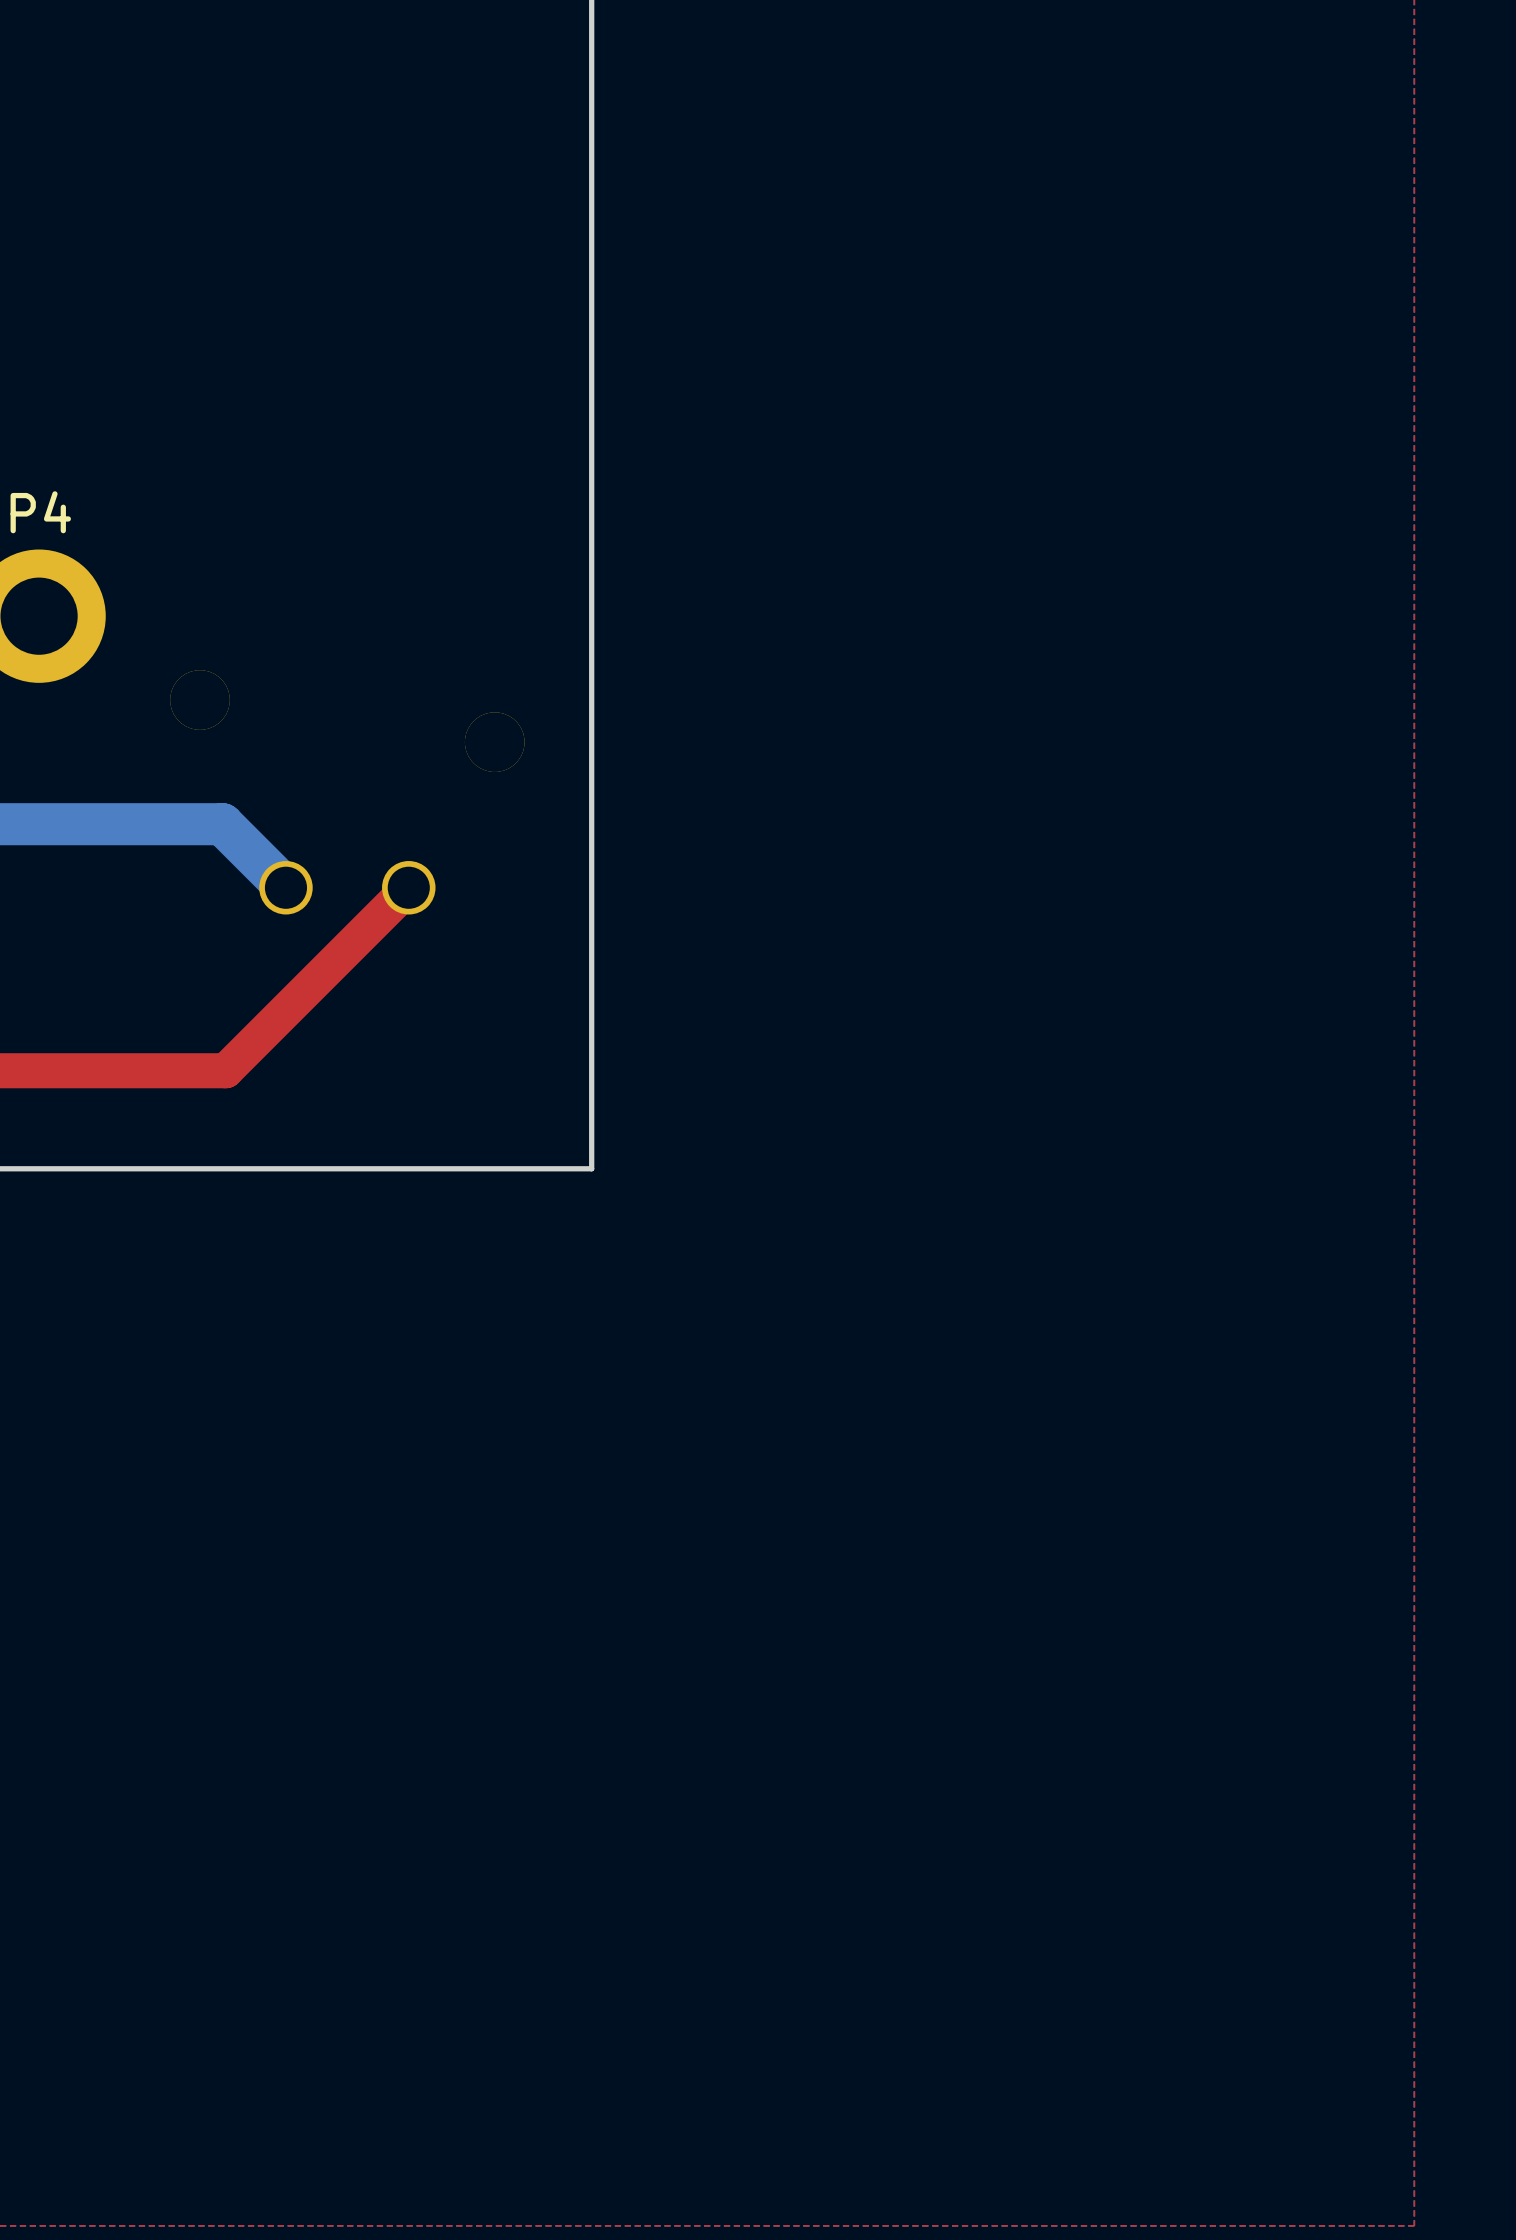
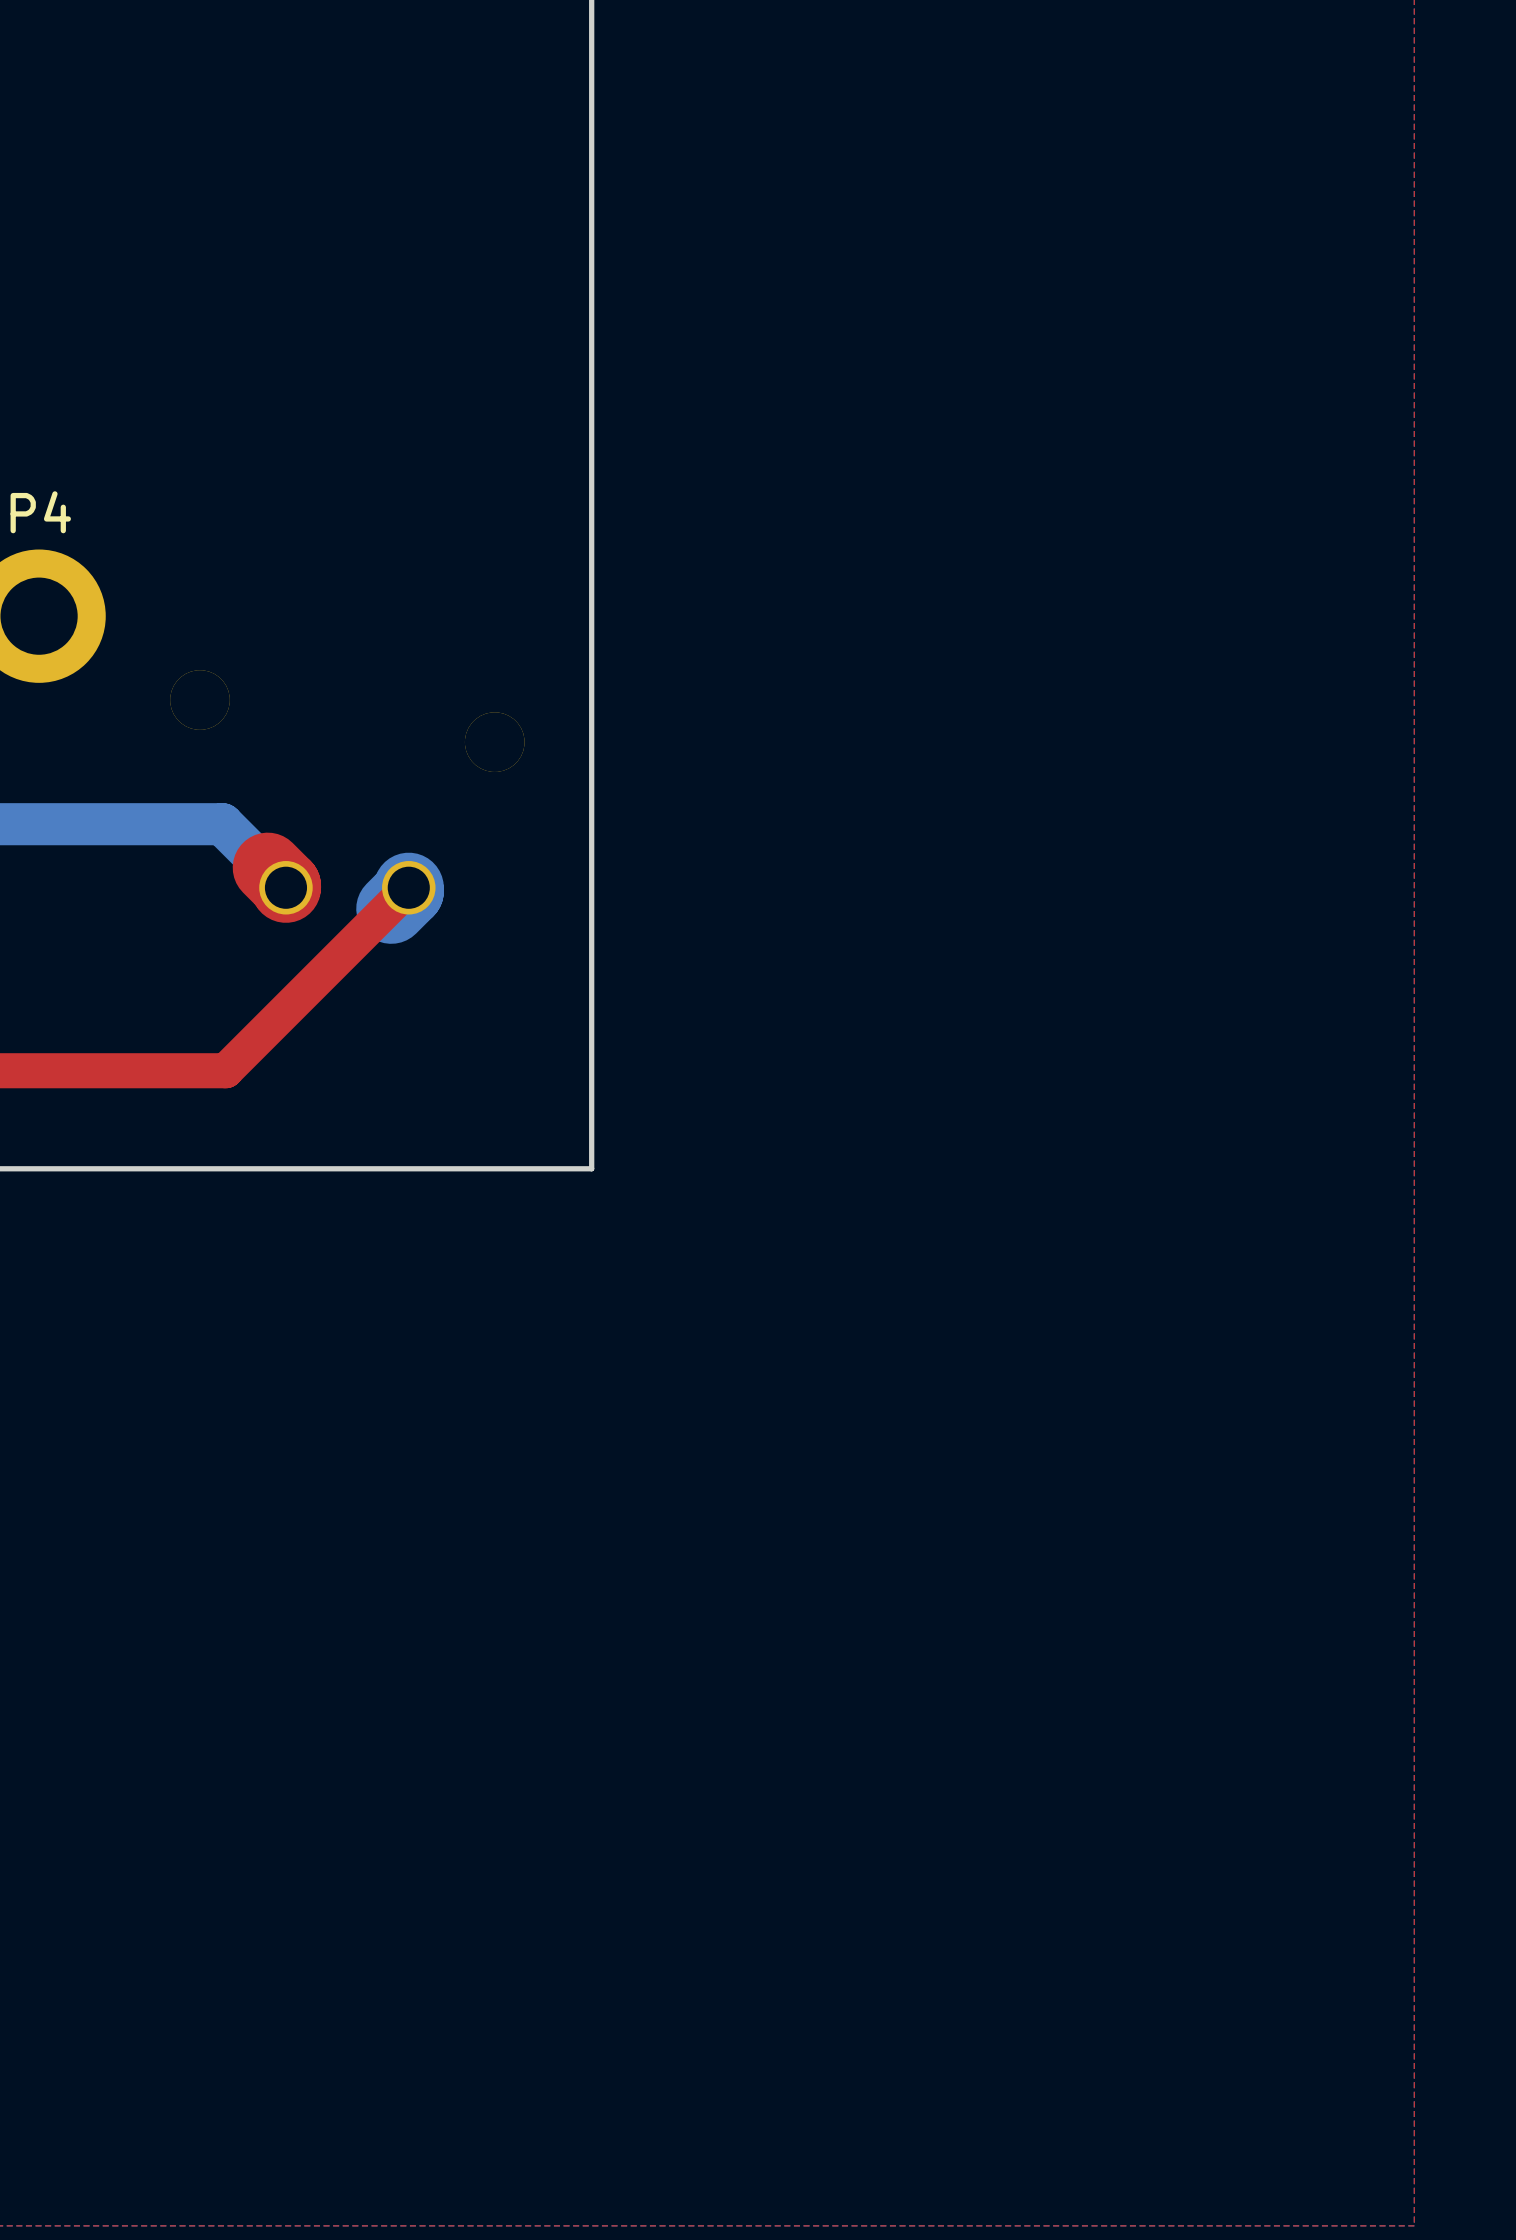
top track: none -> (267, 867) (285, 887)
bottom track: none -> (408, 887) (408, 891) (391, 908)

